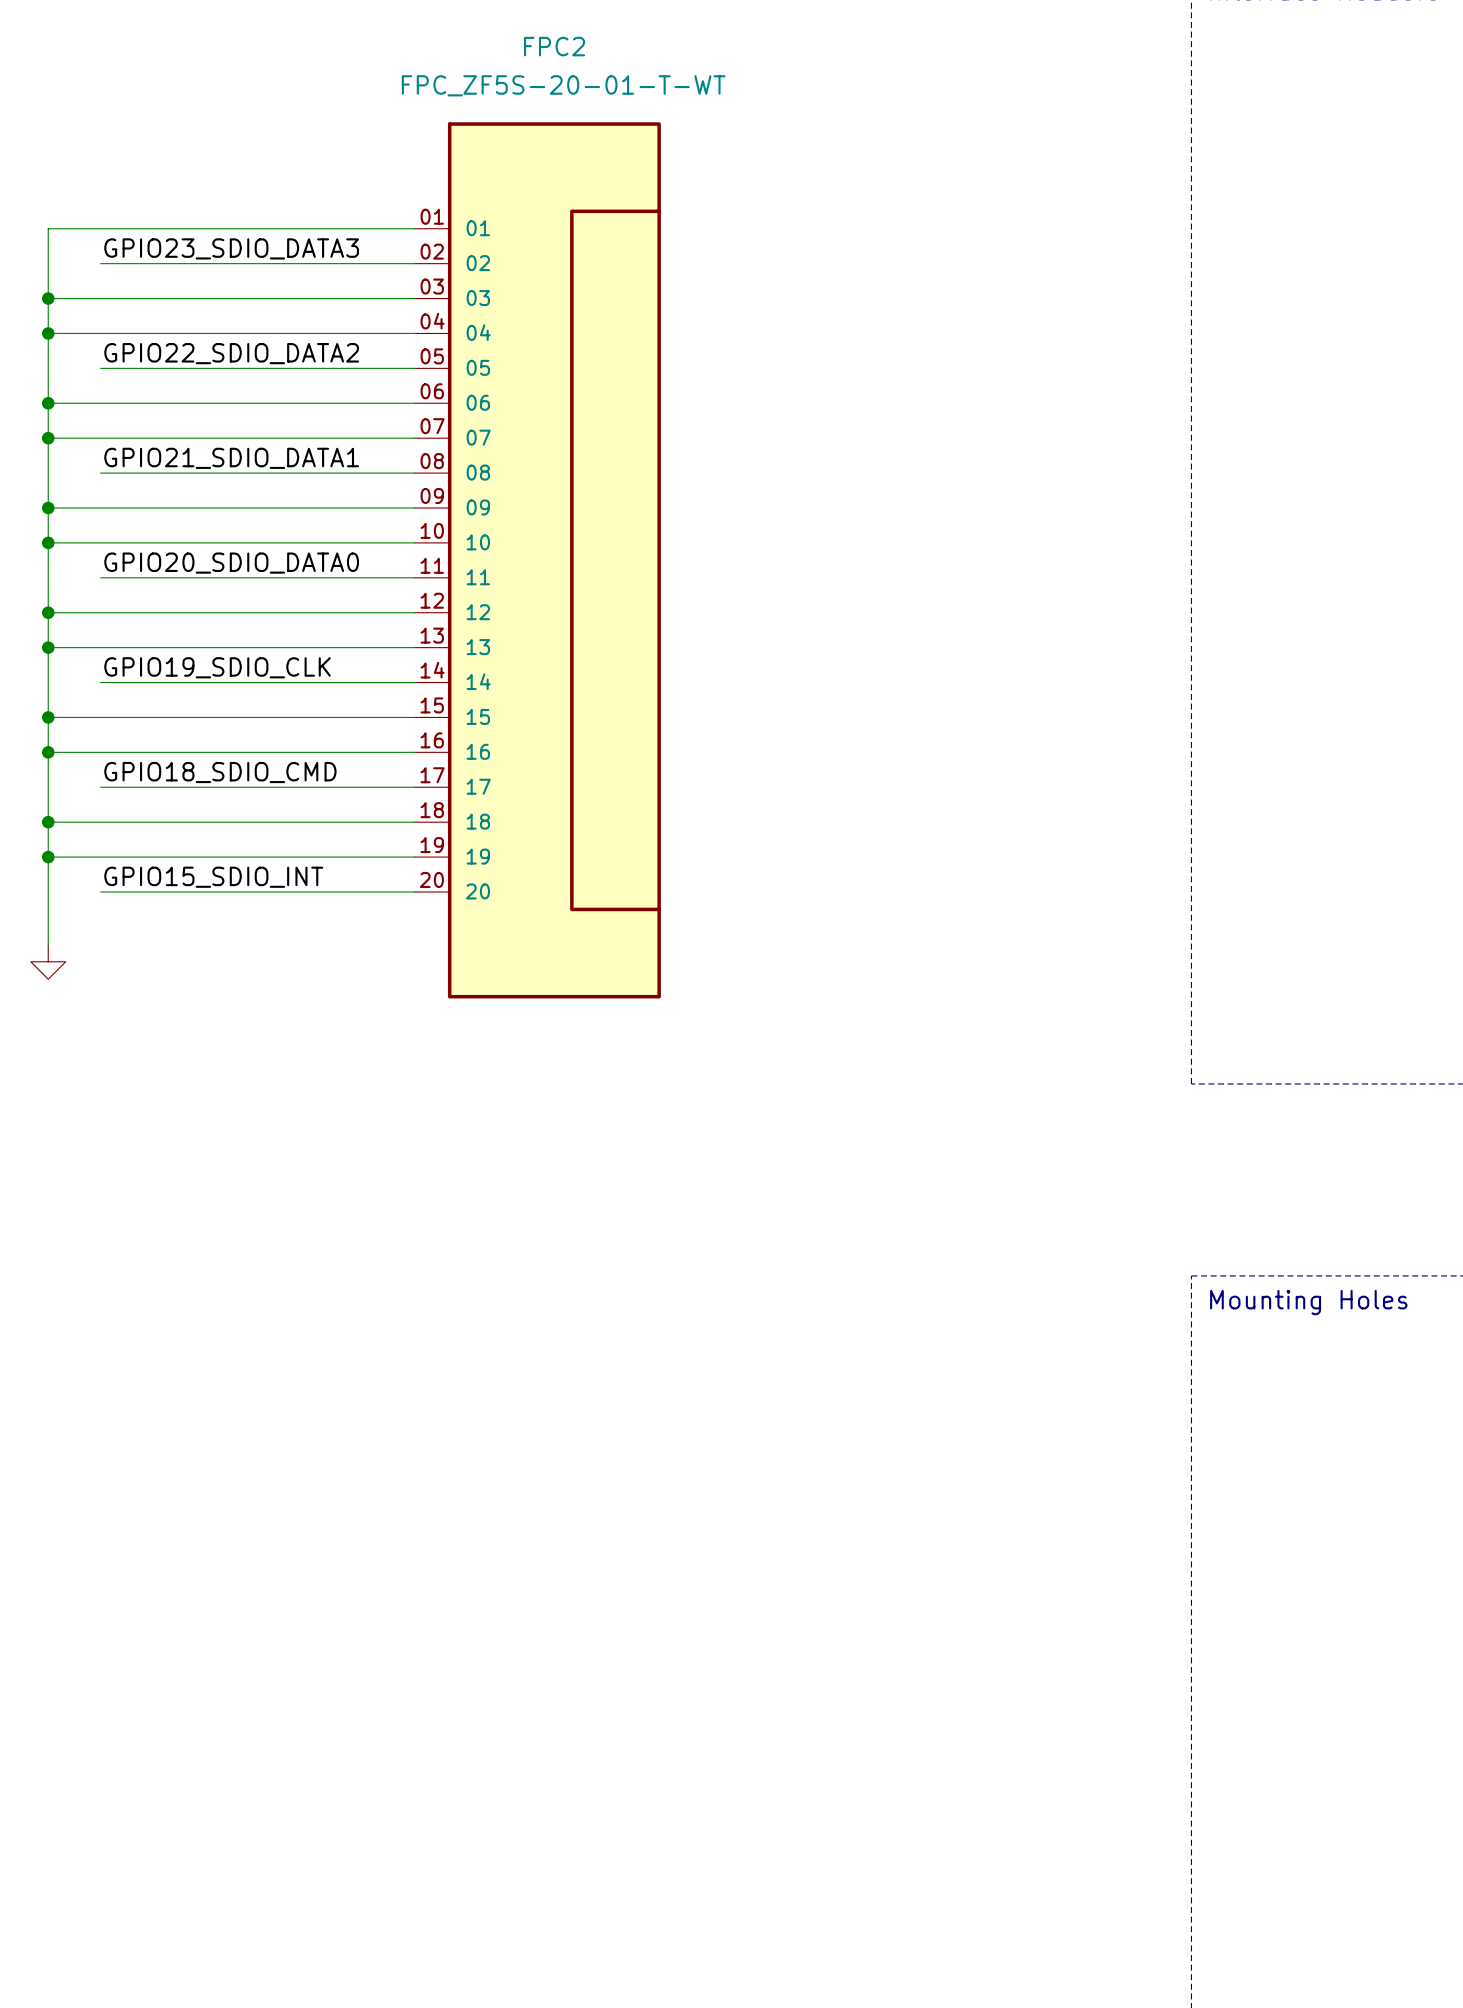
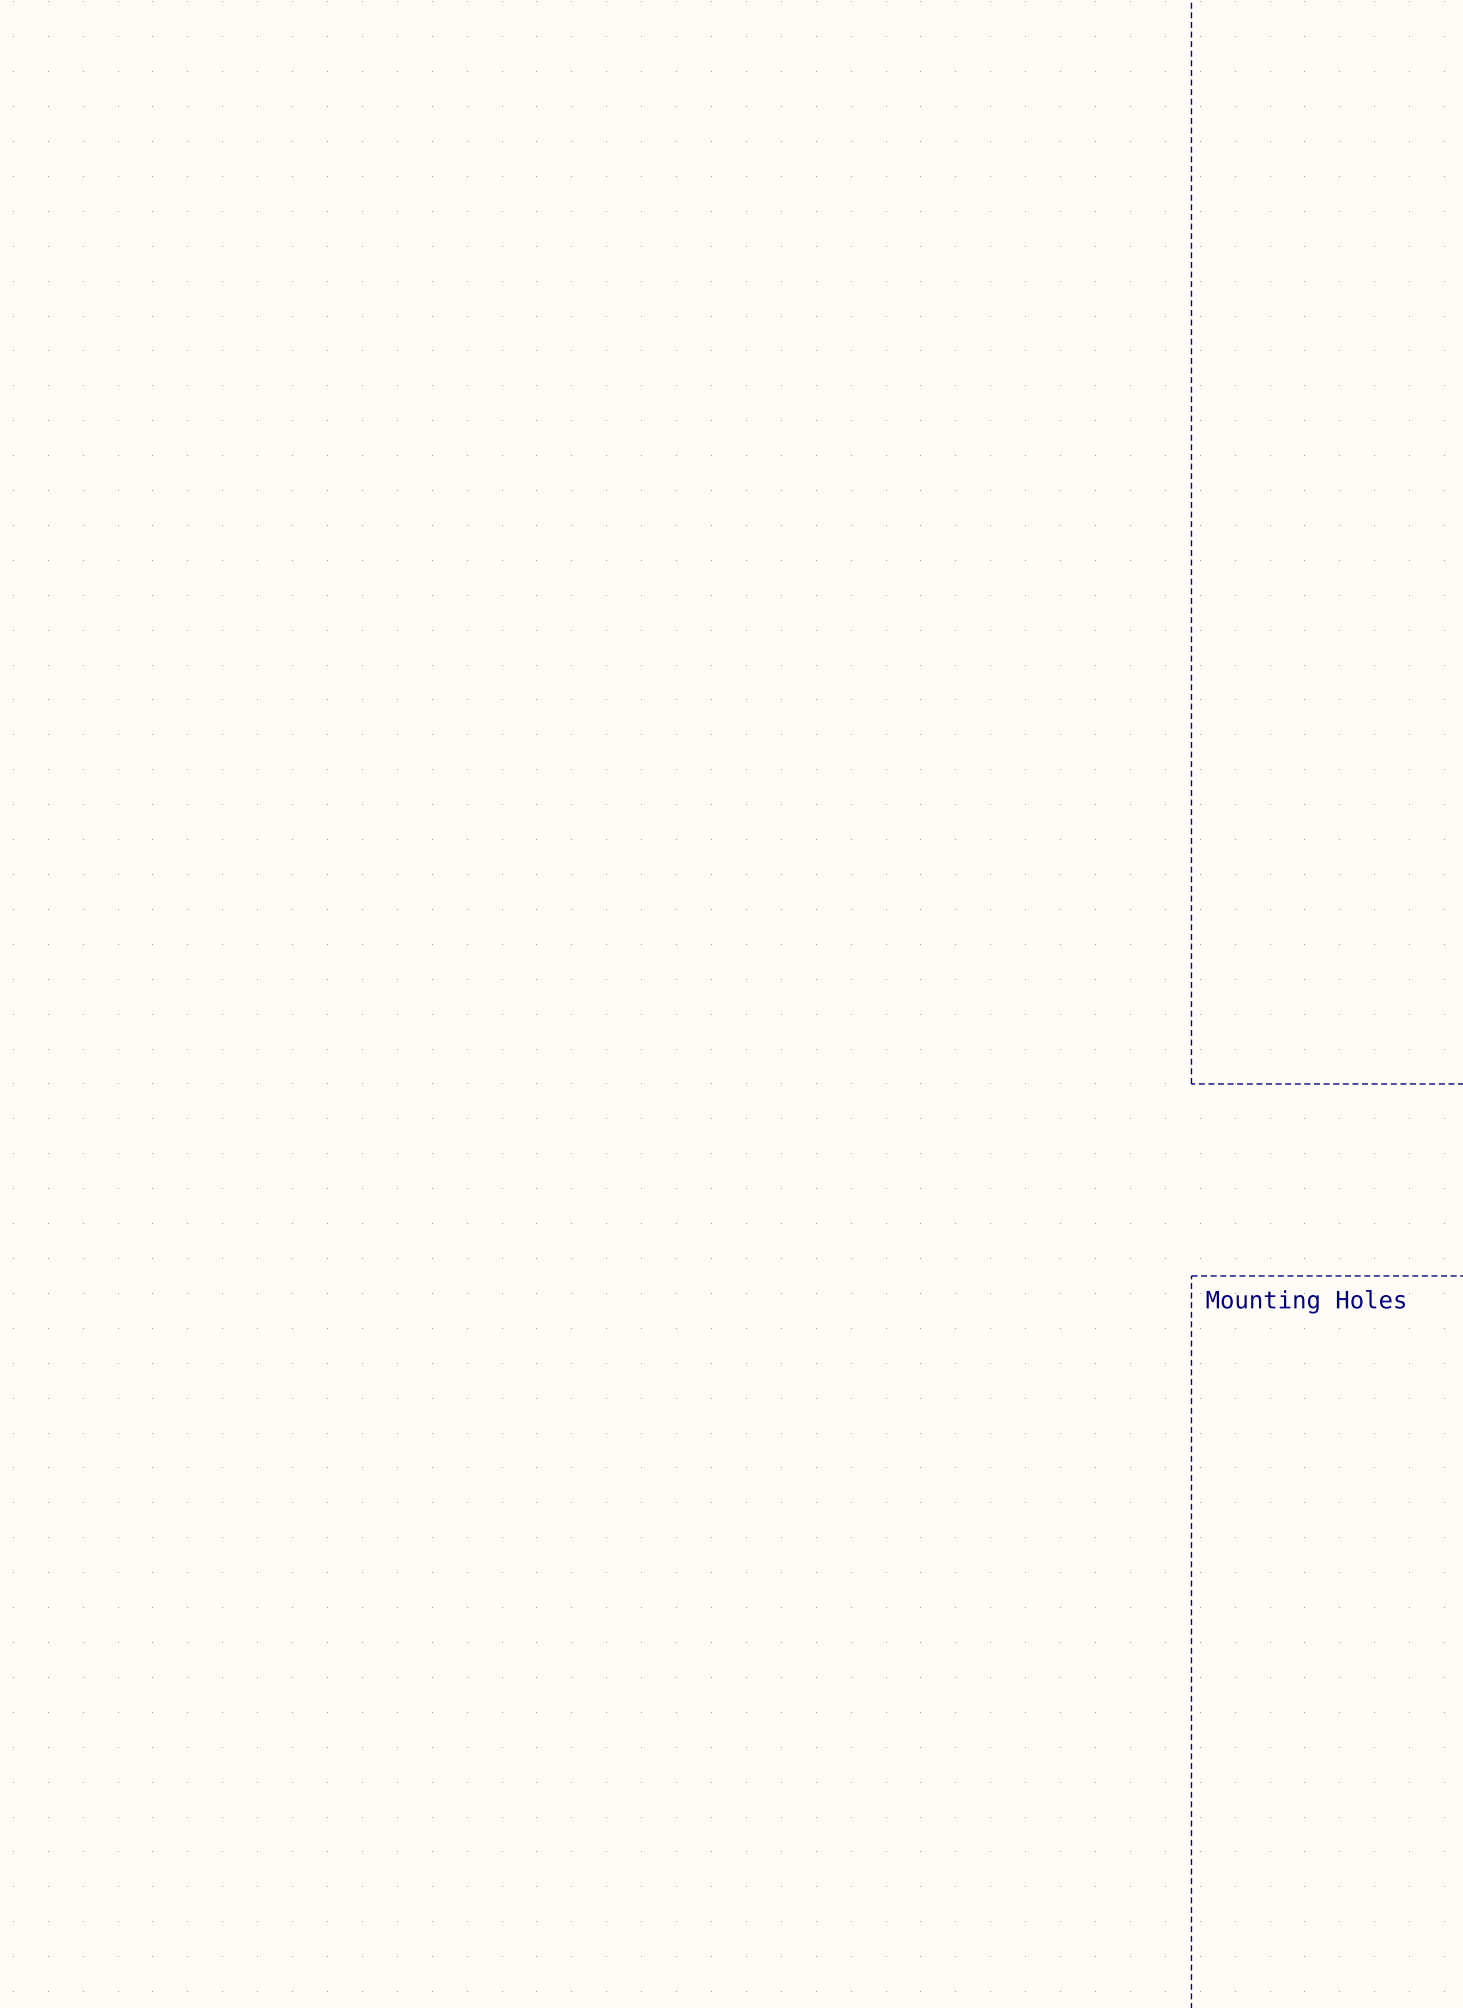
wire: (414, 228) (48, 228) (48, 944) -> none
label: GPIO23_SDIO_DATA3 (231, 248) -> none
wire: (100, 263) (414, 263) -> none
wire: (48, 298) (414, 298) -> none
junction: (48, 298) -> none
wire: (48, 333) (414, 333) -> none
junction: (48, 333) -> none
label: GPIO22_SDIO_DATA2 (231, 353) -> none
wire: (100, 368) (414, 368) -> none
wire: (48, 403) (414, 403) -> none
junction: (48, 403) -> none
wire: (48, 438) (414, 438) -> none
junction: (48, 438) -> none
label: GPIO21_SDIO_DATA1 (231, 458) -> none
wire: (100, 473) (414, 473) -> none
wire: (48, 508) (414, 508) -> none
junction: (48, 508) -> none
wire: (48, 542) (414, 542) -> none
junction: (48, 542) -> none
FPC2: FPC_ZF5S-20-01-T-WT (537, 560) -> none
label: GPIO20_SDIO_DATA0 (231, 563) -> none
wire: (100, 577) (414, 577) -> none
wire: (48, 612) (414, 612) -> none
junction: (48, 612) -> none
wire: (48, 647) (414, 647) -> none
junction: (48, 647) -> none
label: GPIO19_SDIO_CLK (217, 667) -> none
wire: (100, 682) (414, 682) -> none
wire: (48, 717) (414, 717) -> none
junction: (48, 717) -> none
wire: (48, 752) (414, 752) -> none
junction: (48, 752) -> none
label: GPIO18_SDIO_CMD (220, 772) -> none
wire: (100, 787) (414, 787) -> none
wire: (48, 822) (414, 822) -> none
junction: (48, 822) -> none
wire: (48, 857) (414, 857) -> none
junction: (48, 857) -> none
label: GPIO15_SDIO_INT (213, 877) -> none
wire: (100, 891) (414, 891) -> none
power symbol: (48, 961) -> none

